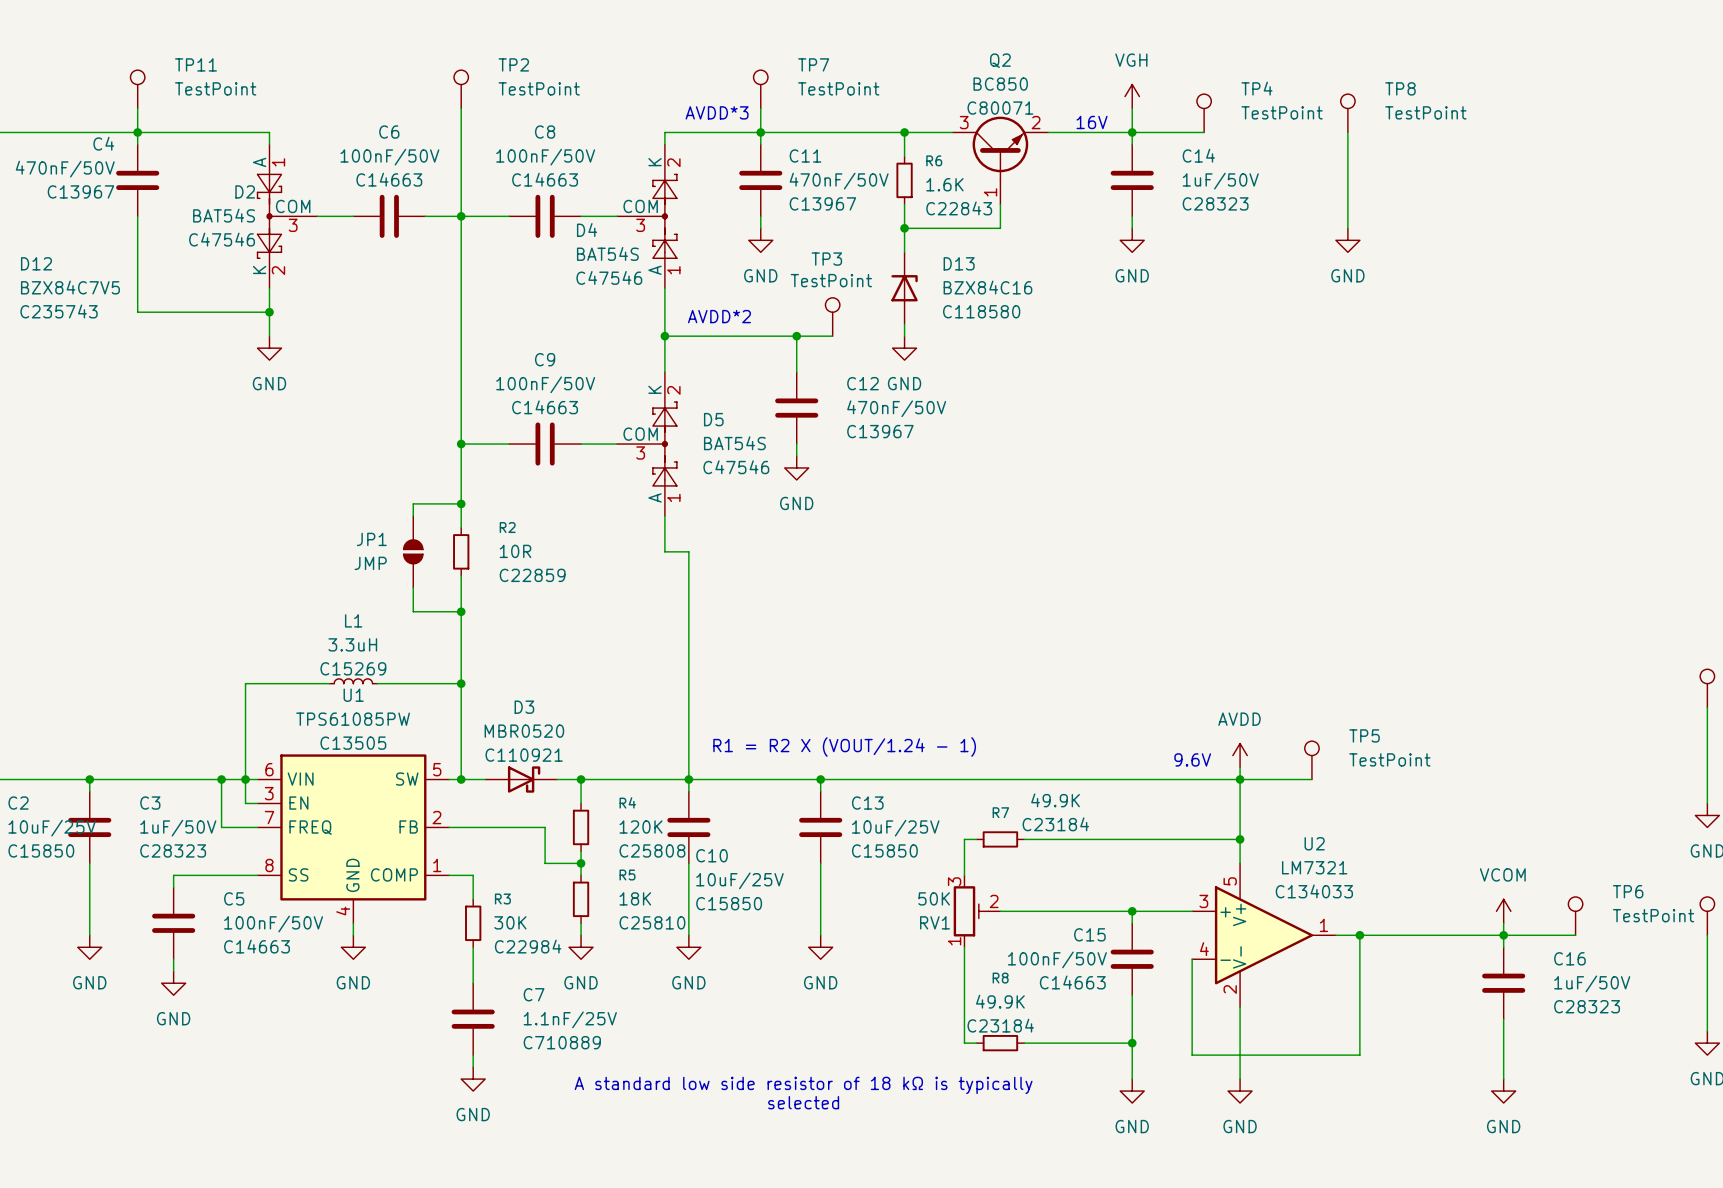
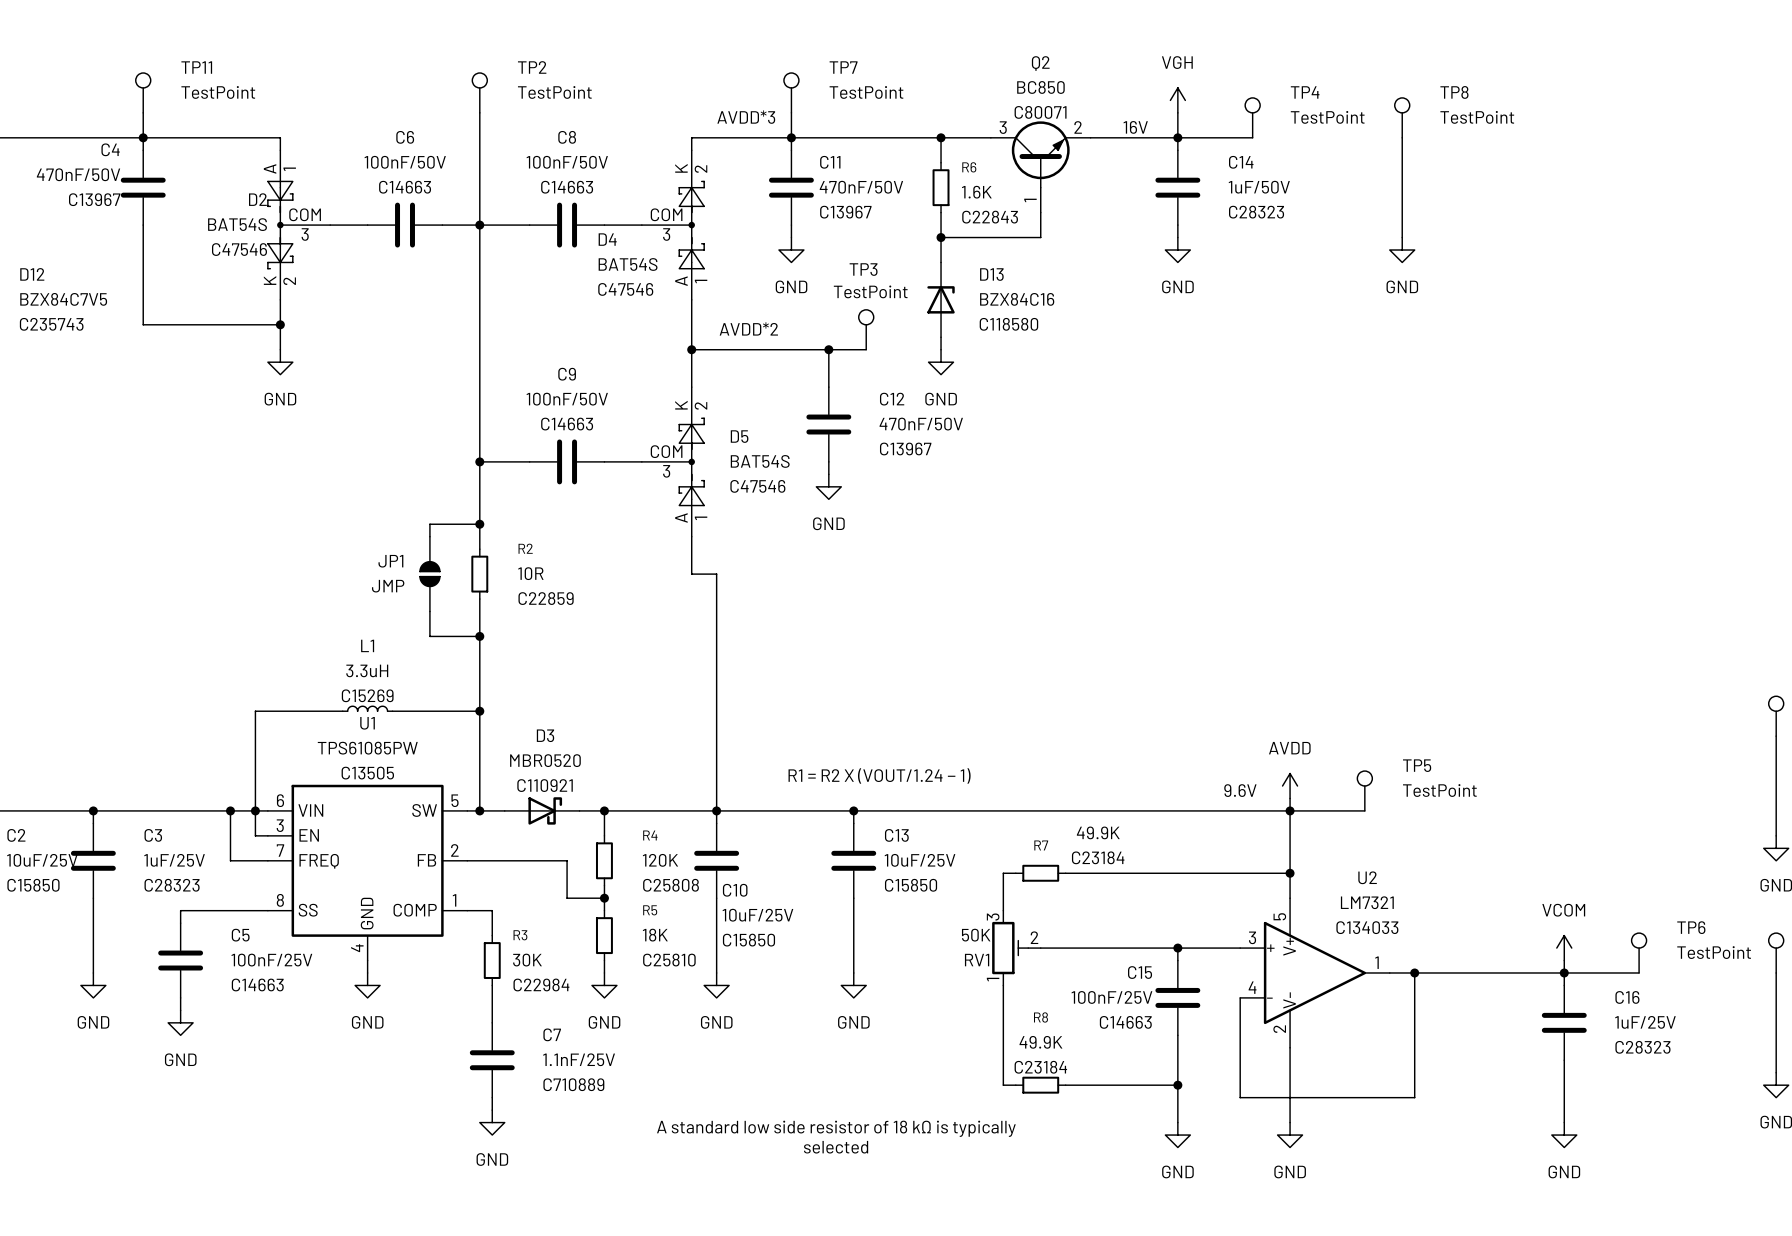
C3 value: 1uF/50V (178, 828) -> 1uF/25V (174, 860)
C5 value: 100nF/50V (273, 924) -> 100nF/25V (271, 960)
C15 value: 100nF/50V (1057, 959) -> 100nF/25V (1111, 997)
C16 value: 1uF/50V (1592, 983) -> 1uF/25V (1645, 1022)

